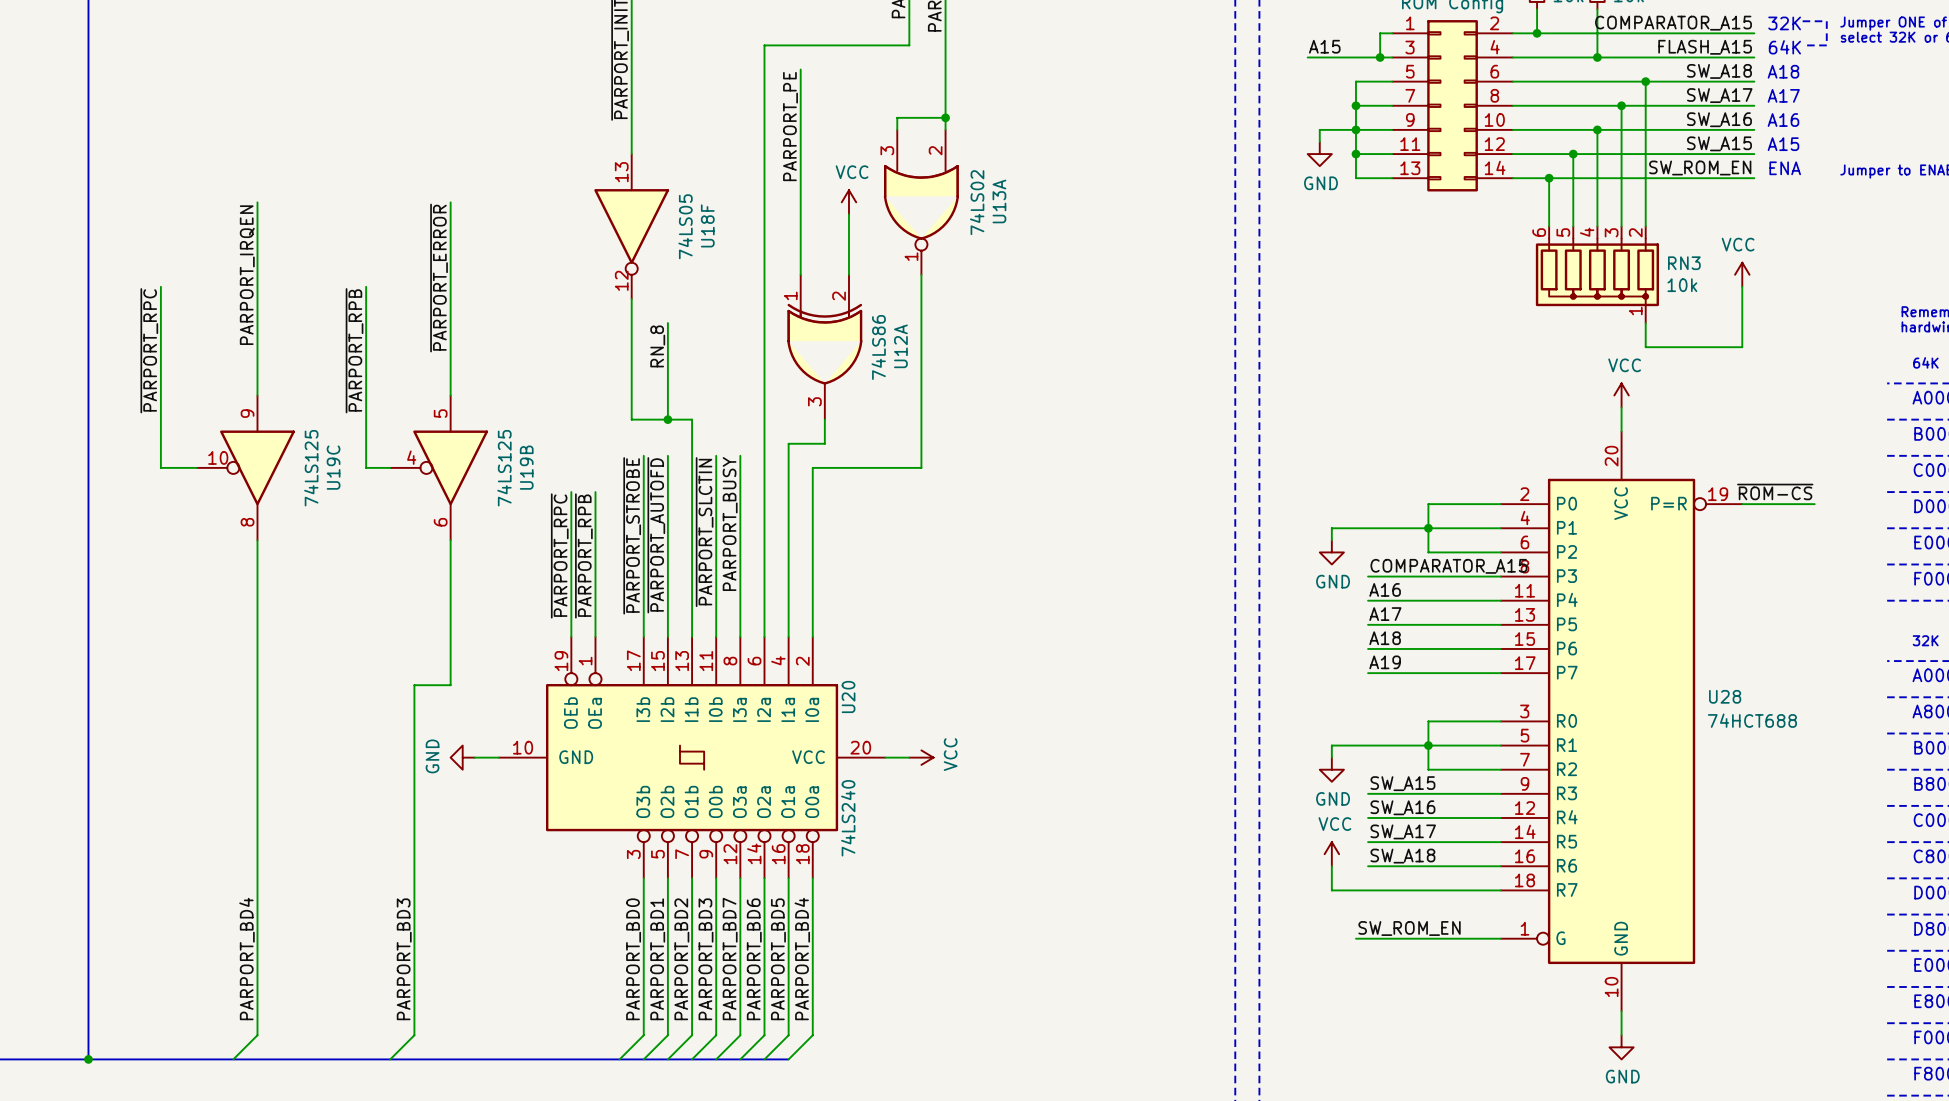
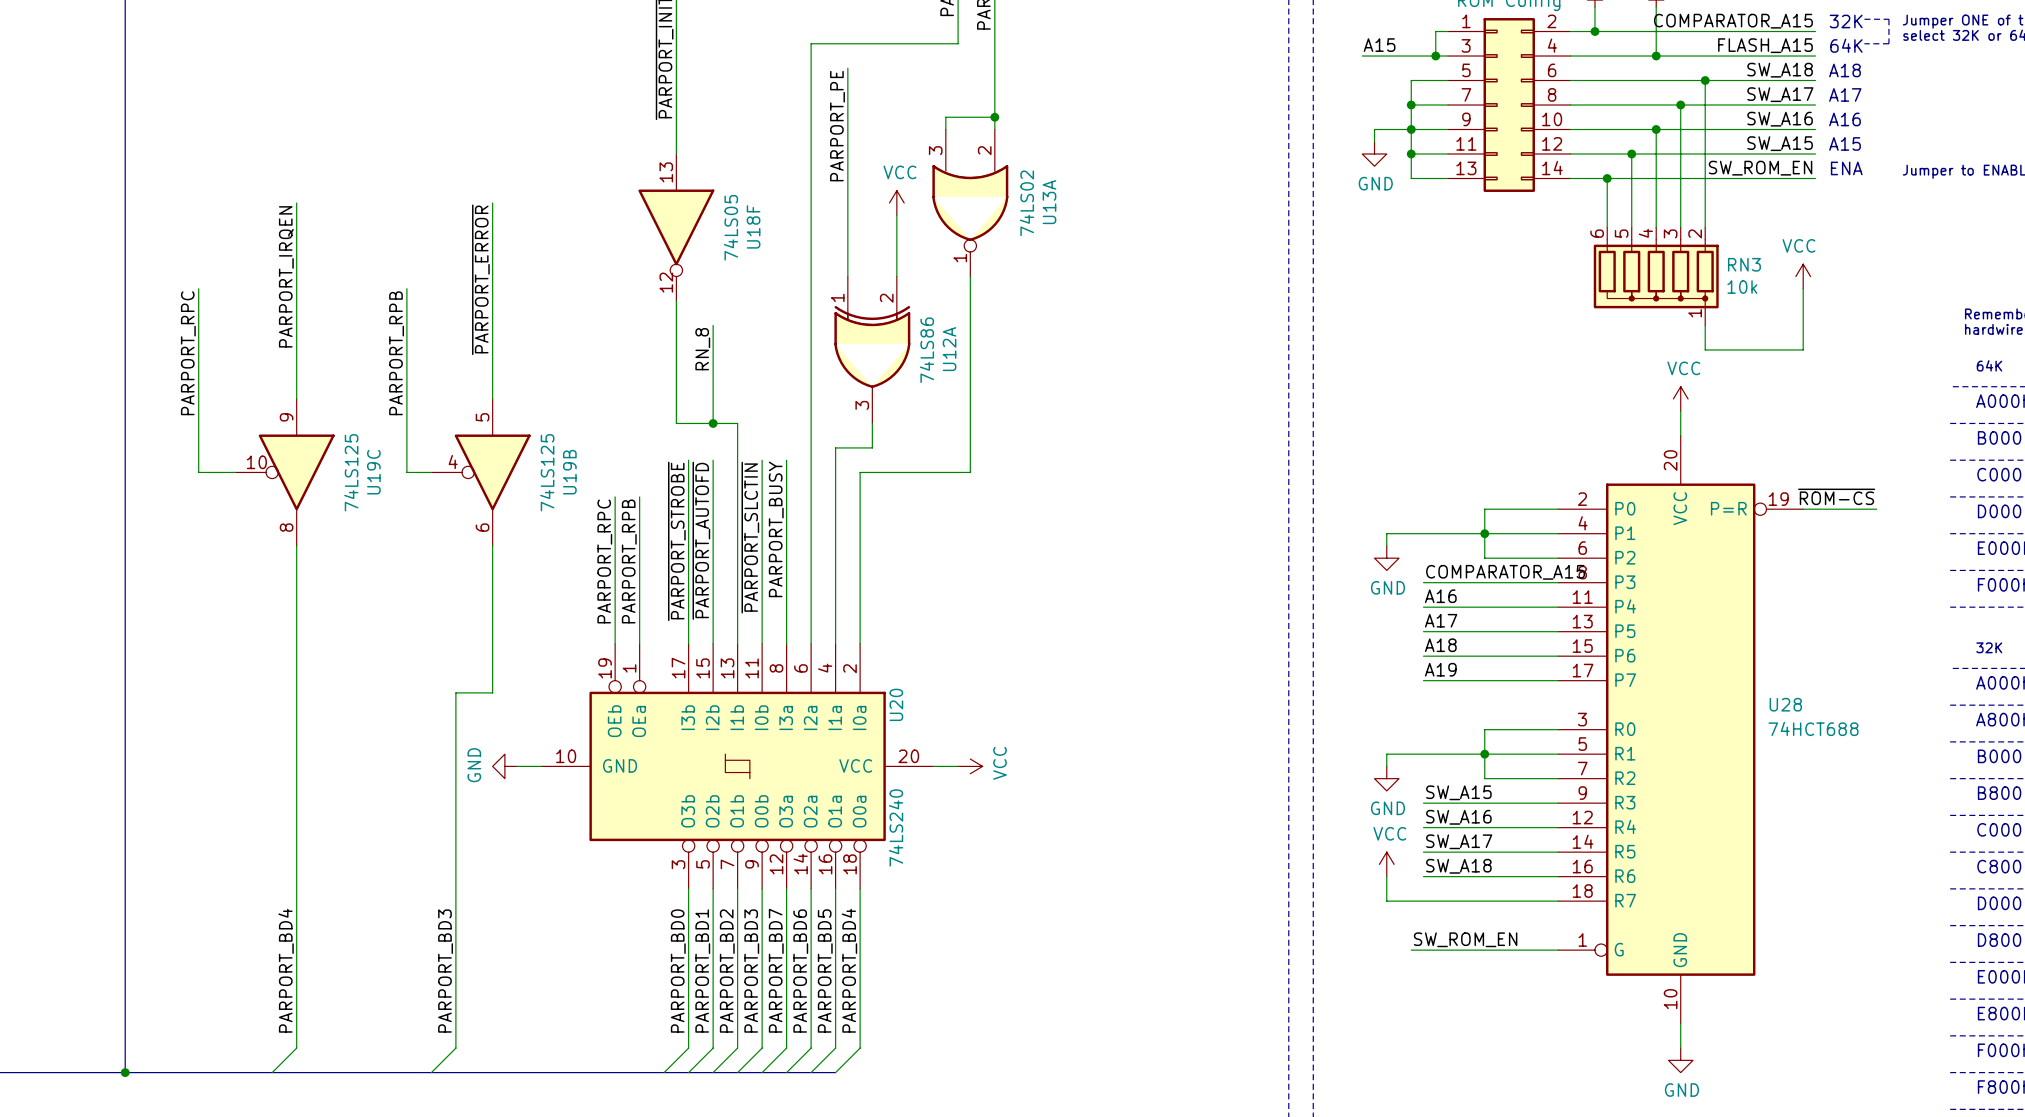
label: ~{PARPORT_RPC} (149, 350) -> PARPORT_RPC (188, 353)
label: ~{PARPORT_RPB} (354, 350) -> PARPORT_RPB (396, 353)
label: ~{PARPORT_RPC} (559, 555) -> PARPORT_RPC (604, 561)
label: ~{PARPORT_RPB} (583, 555) -> PARPORT_RPB (629, 561)

